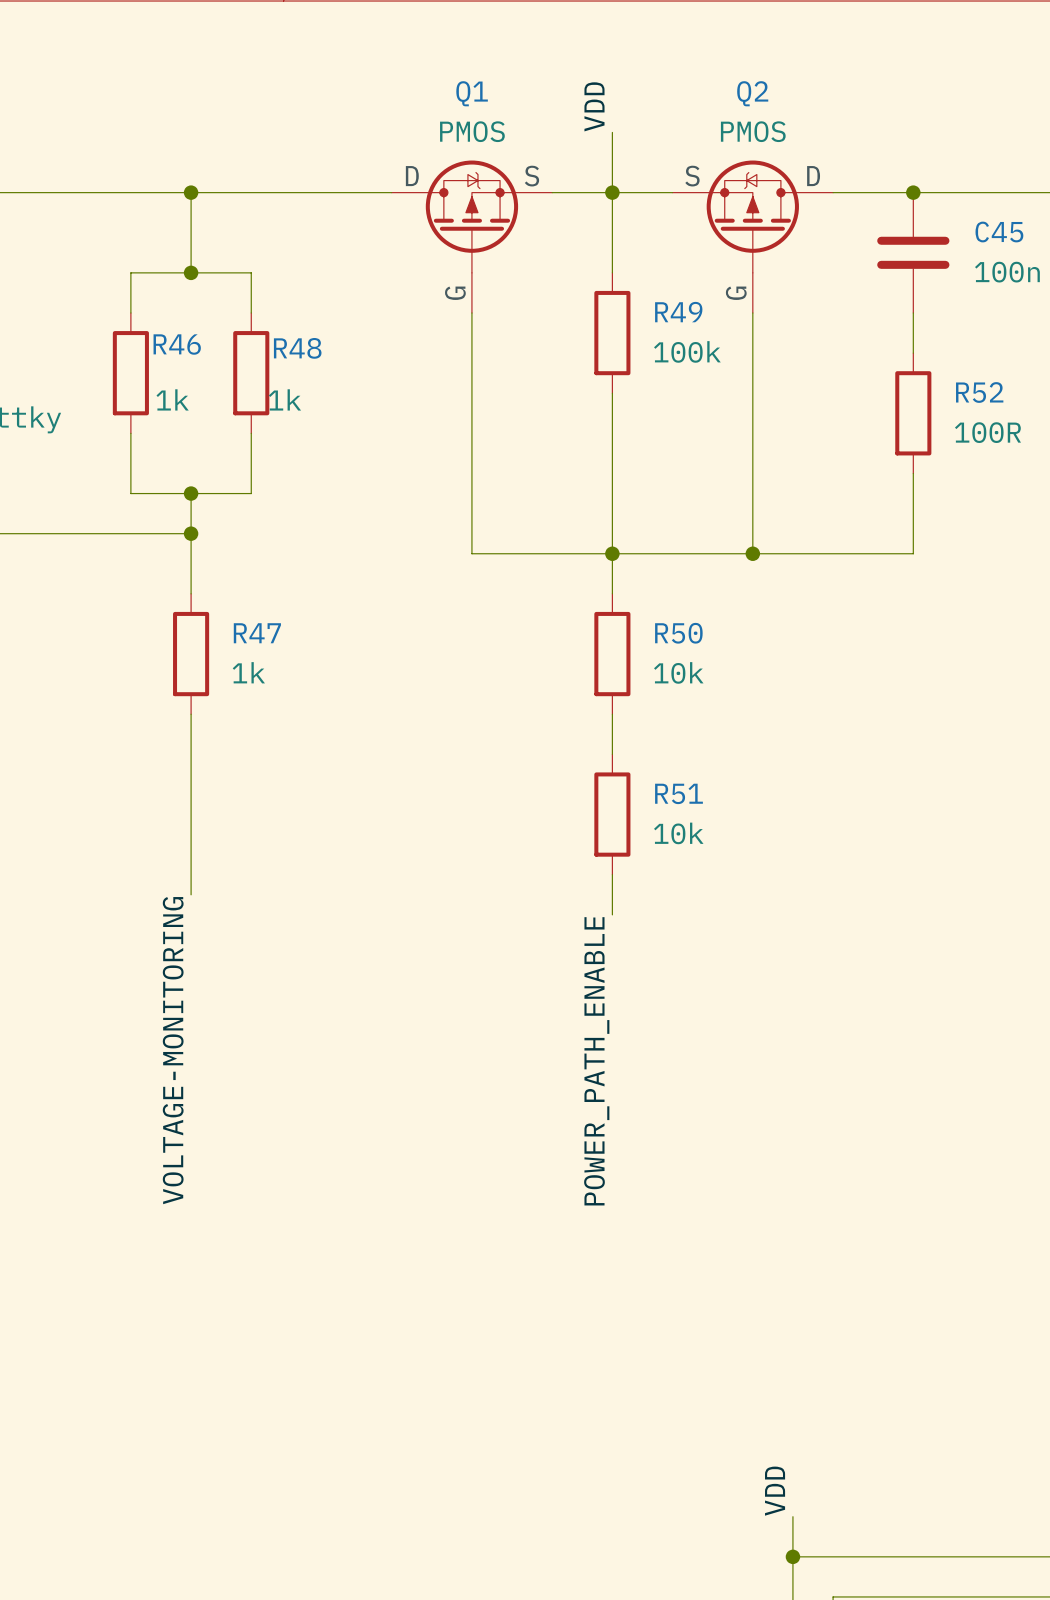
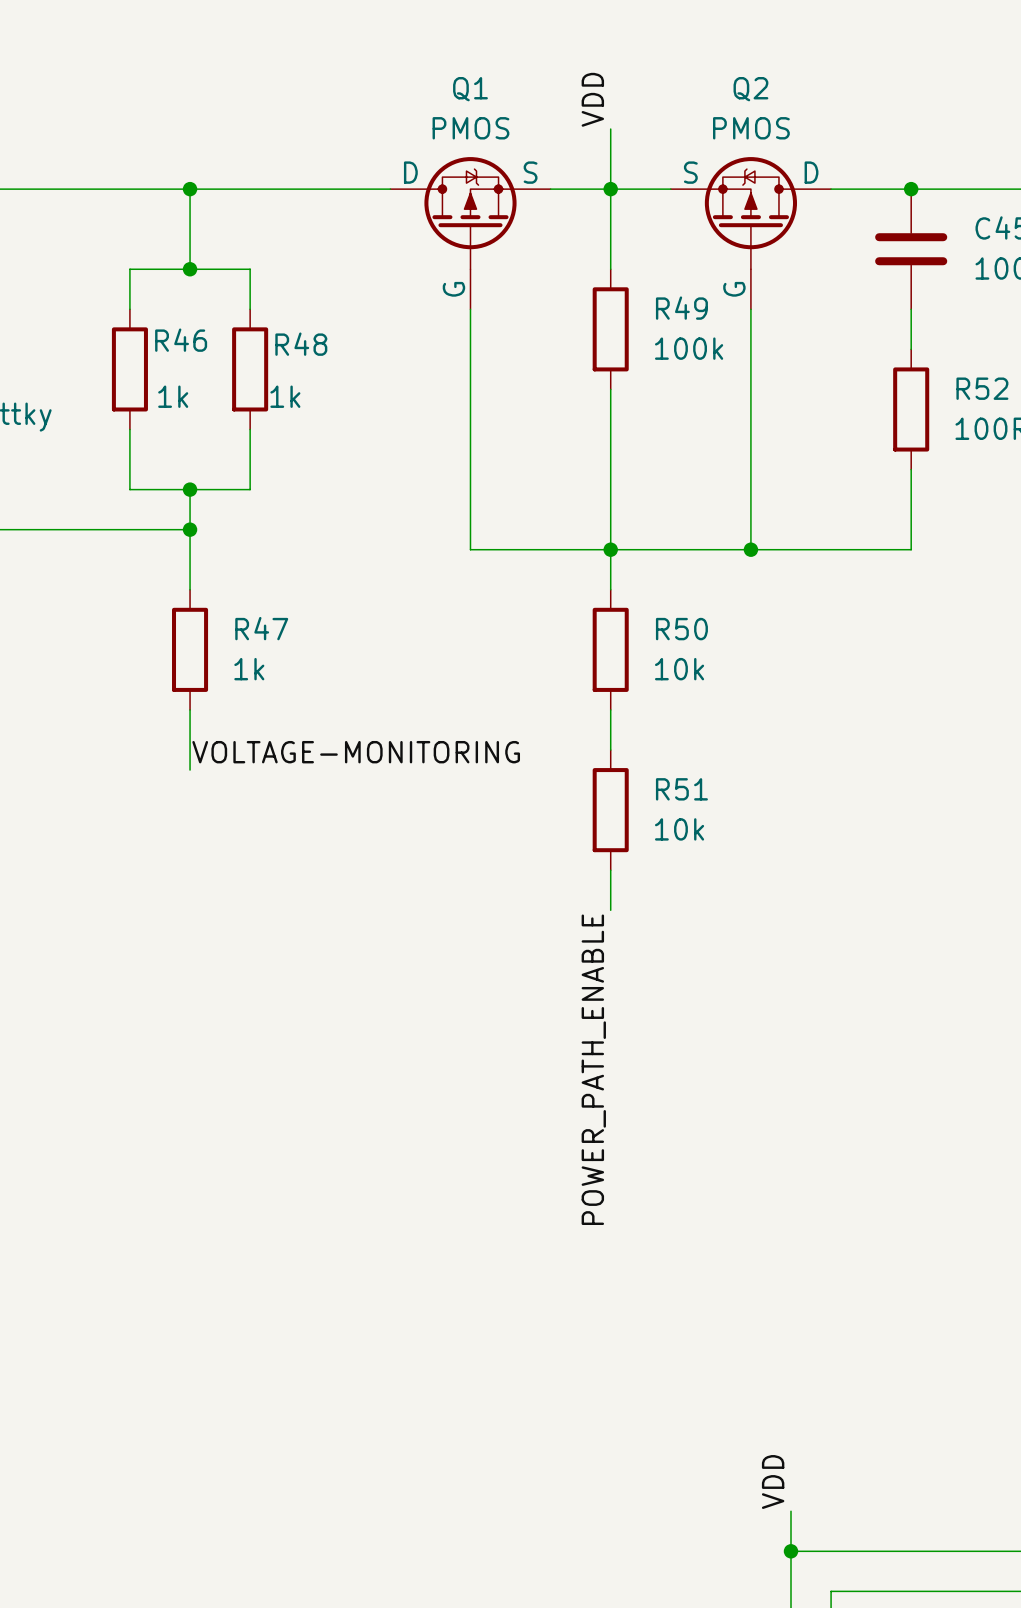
wire: (191, 774) (191, 894) -> none
label rotation: 0° (173, 1050) -> 90° clockwise (356, 752)
label position: VOLTAGE-MONITORING (173, 1050) -> VOLTAGE-MONITORING (356, 752)

